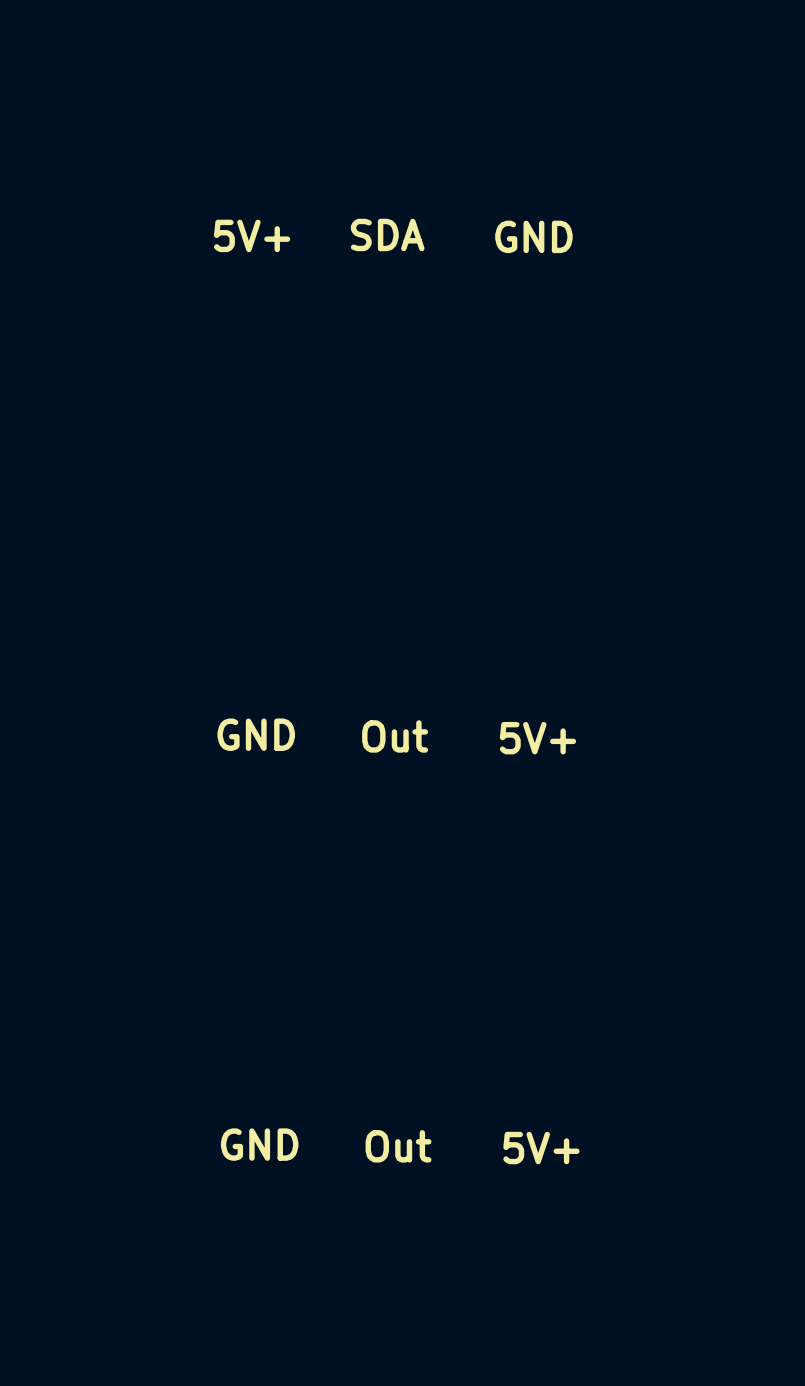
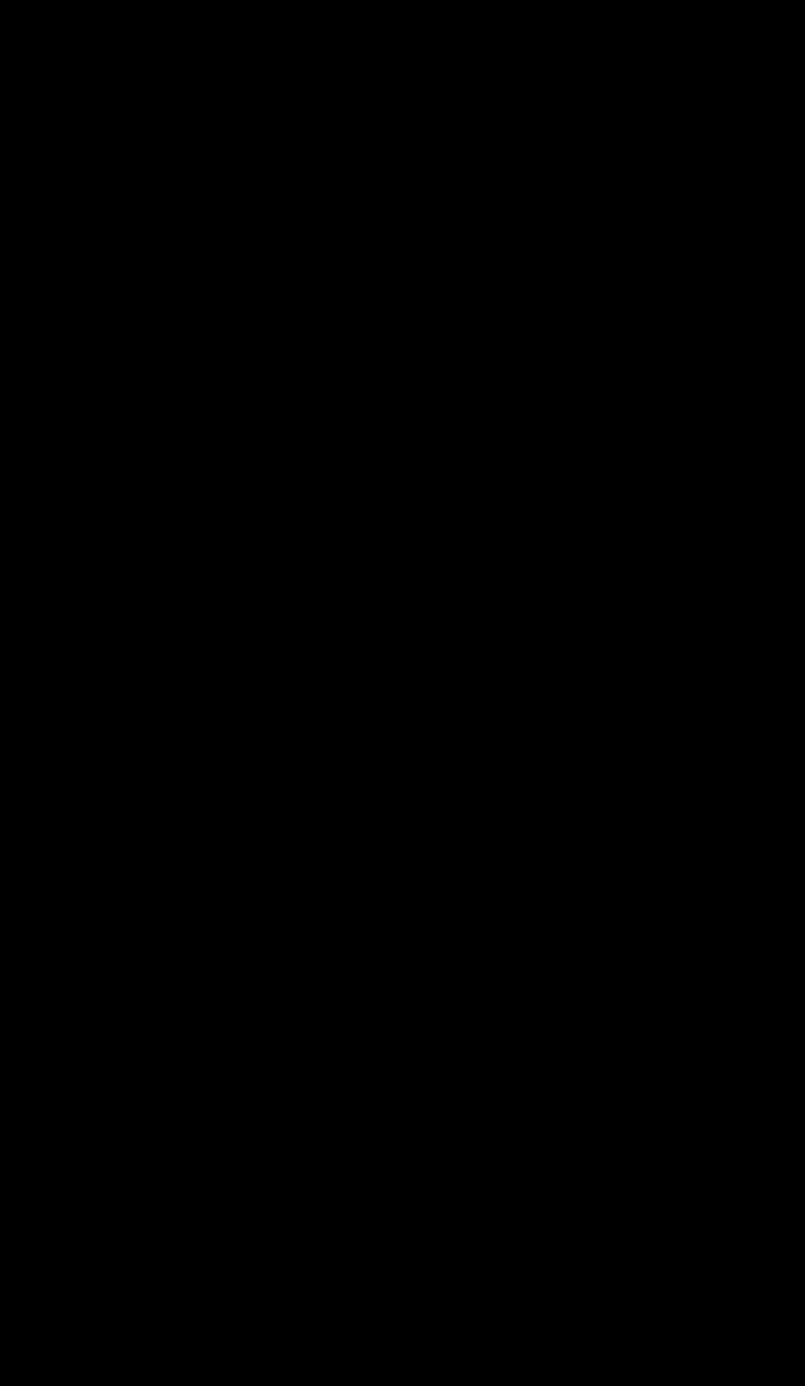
text: SDA (387, 234) -> none
text: 5V+ (252, 235) -> none
text: GND (533, 236) -> none
text: GND (256, 734) -> none
text: Out (395, 736) -> none
text: 5V+ (538, 738) -> none
text: GND (259, 1144) -> none
text: Out (398, 1146) -> none
text: 5V+ (541, 1148) -> none

